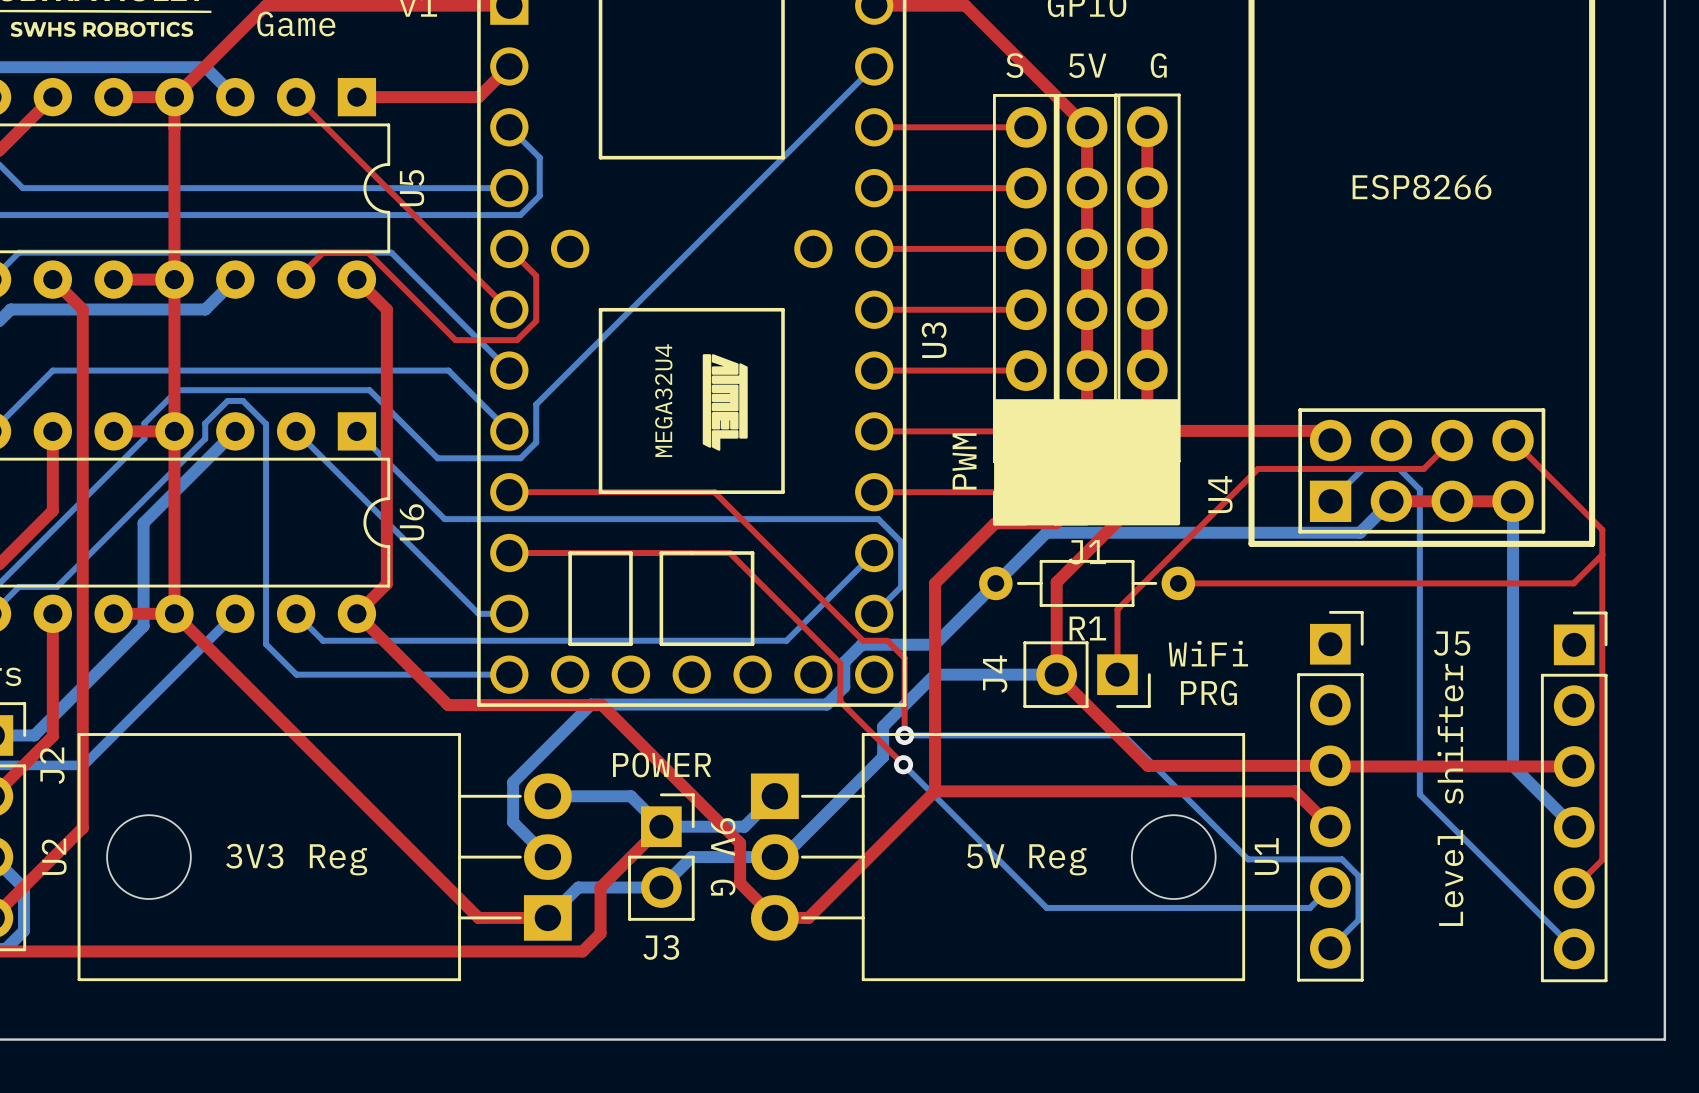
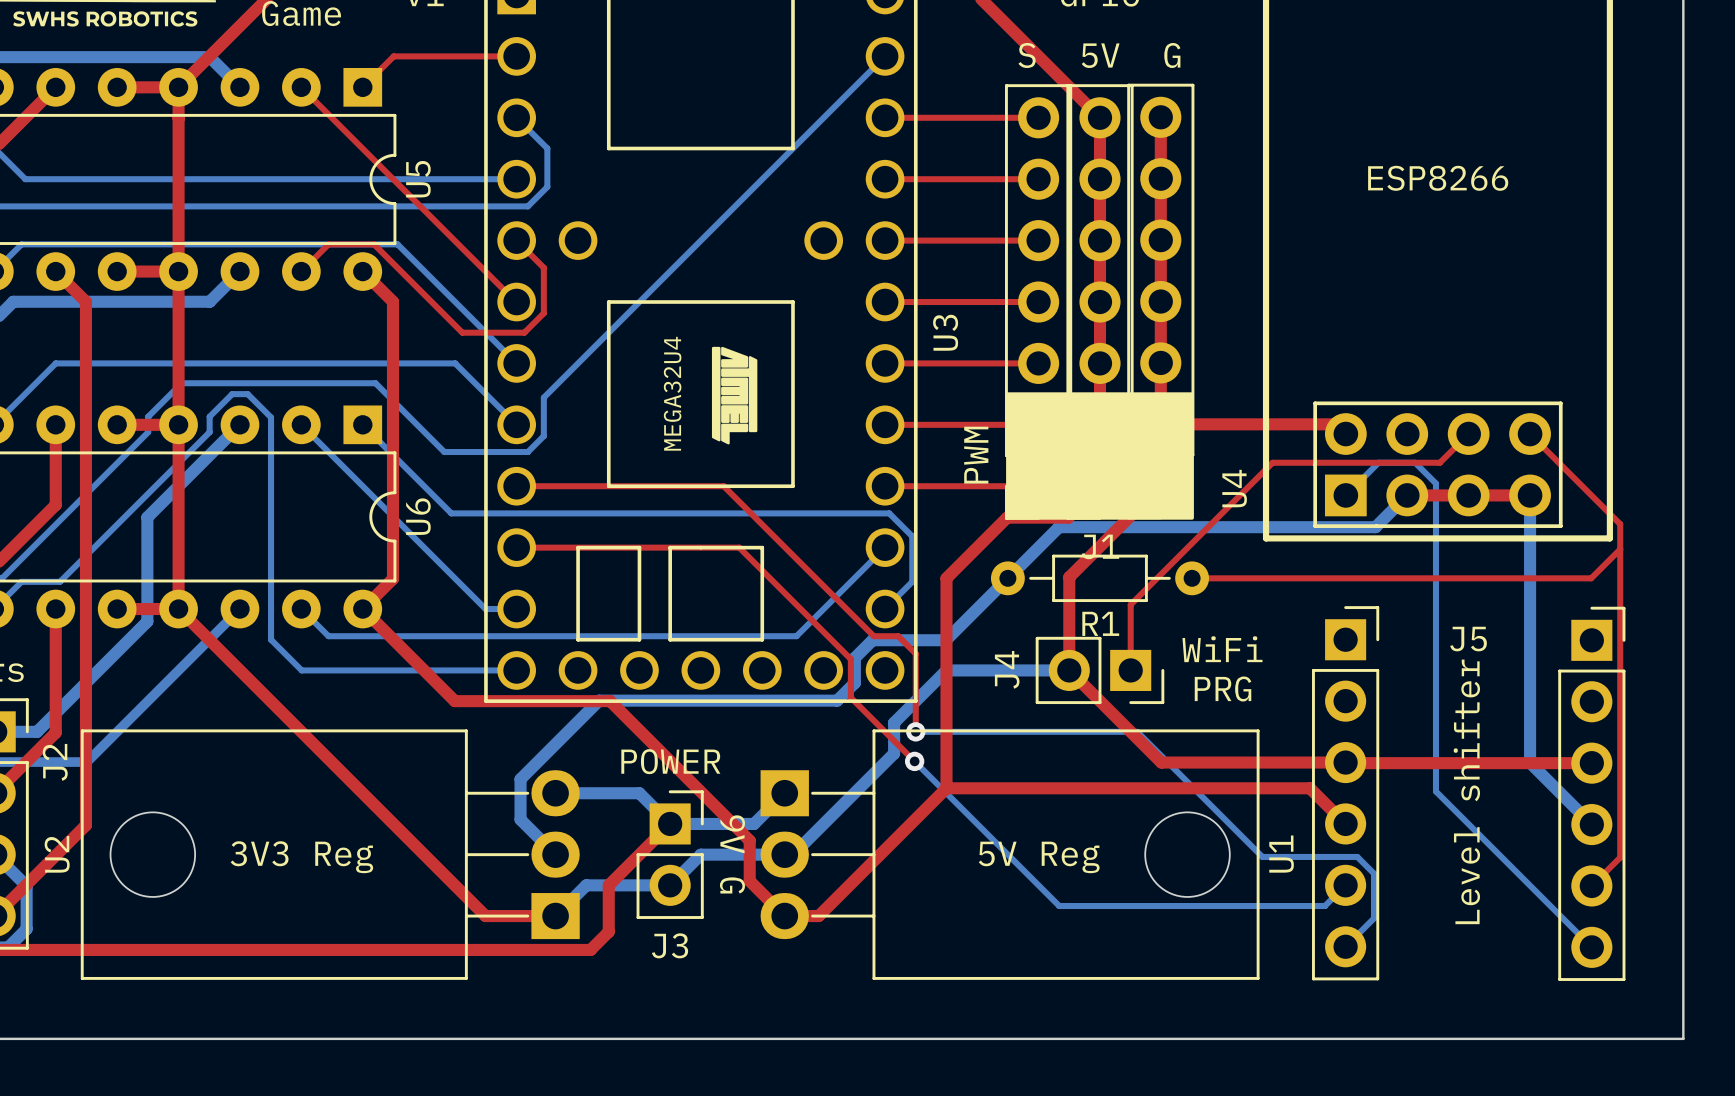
top track: (509, 66) (478, 97) (356, 97) -> (516, 56) (393, 56) (362, 87)

